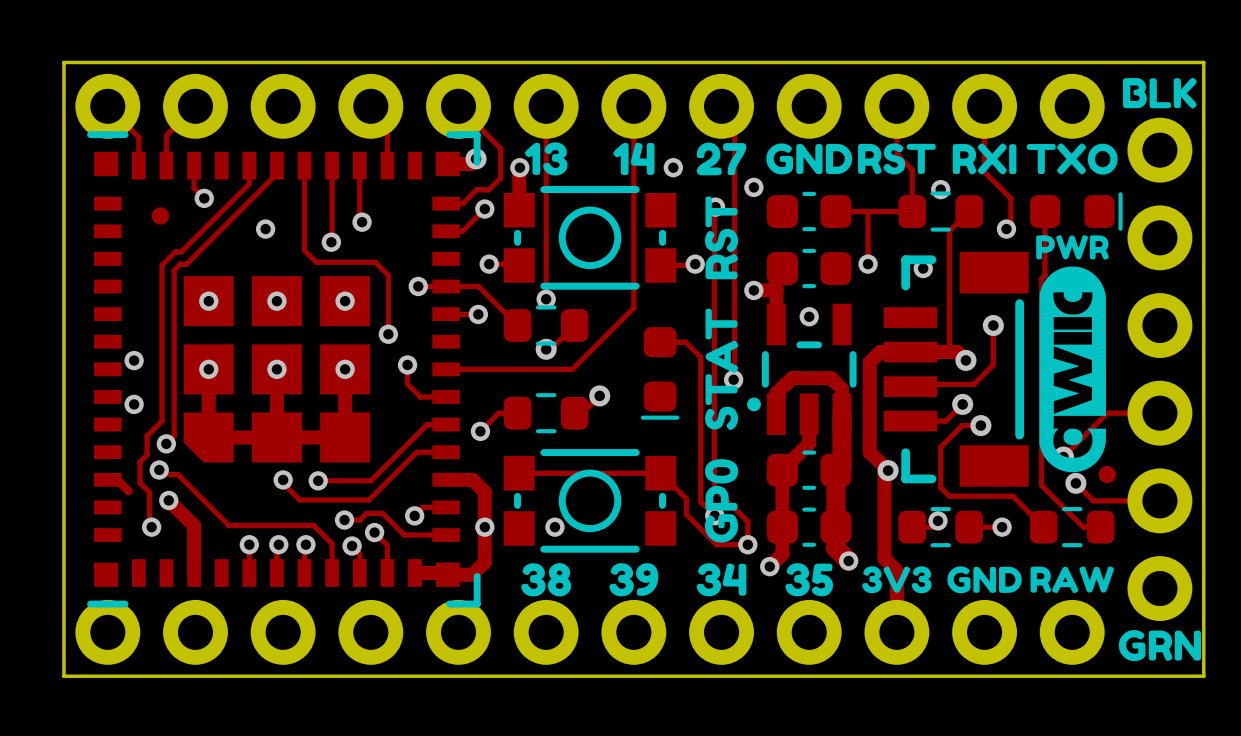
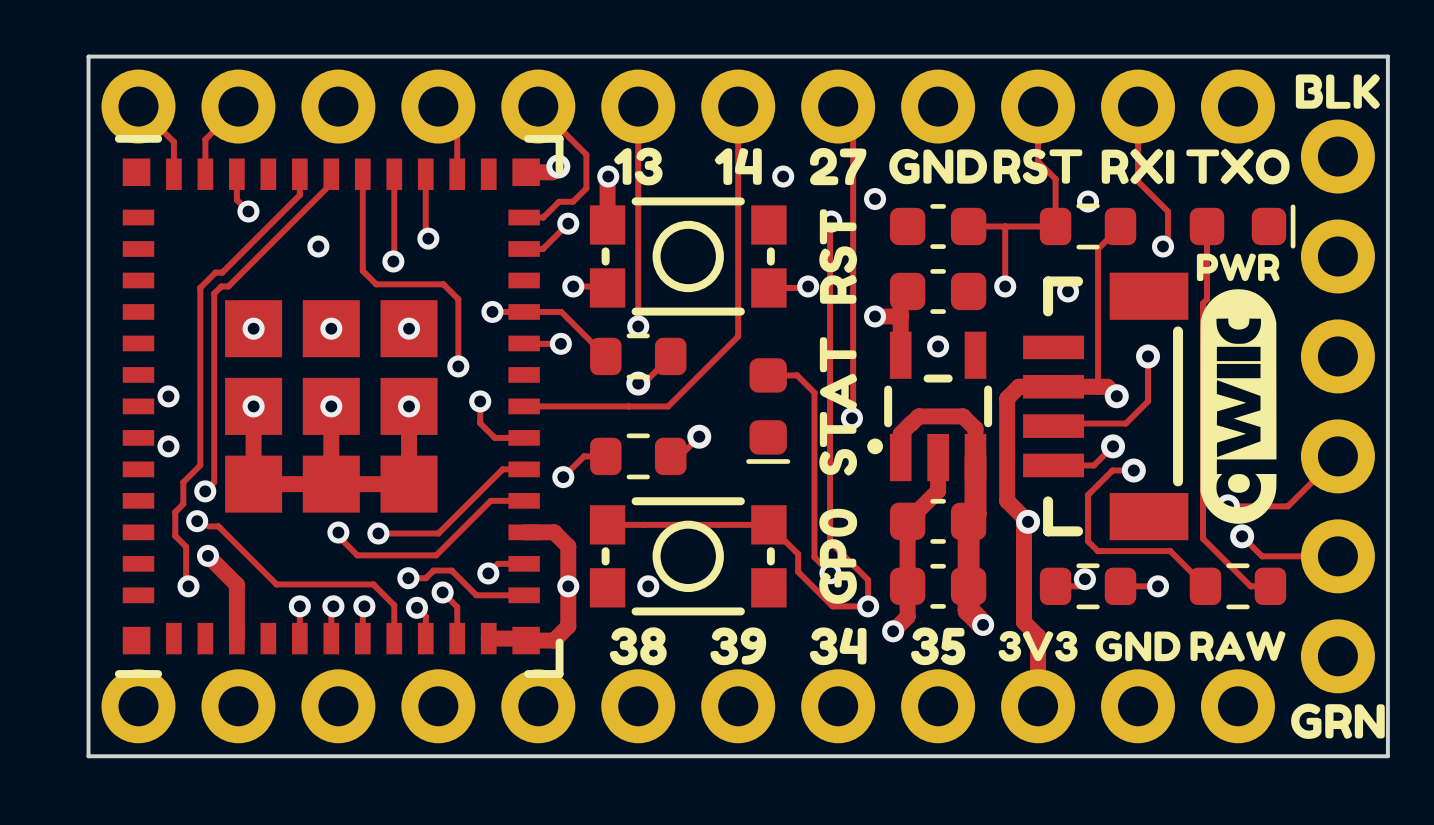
part footprint: [87, 131, 481, 608] -> [114, 134, 564, 678]
part: (160, 215) -> none
track: (1159, 413) (1107, 413) (1063, 457) -> (1337, 456) (1287, 506) (1227, 506)
part: (1107, 474) -> none
track: (107, 479) (117, 479) (128, 491) -> none

